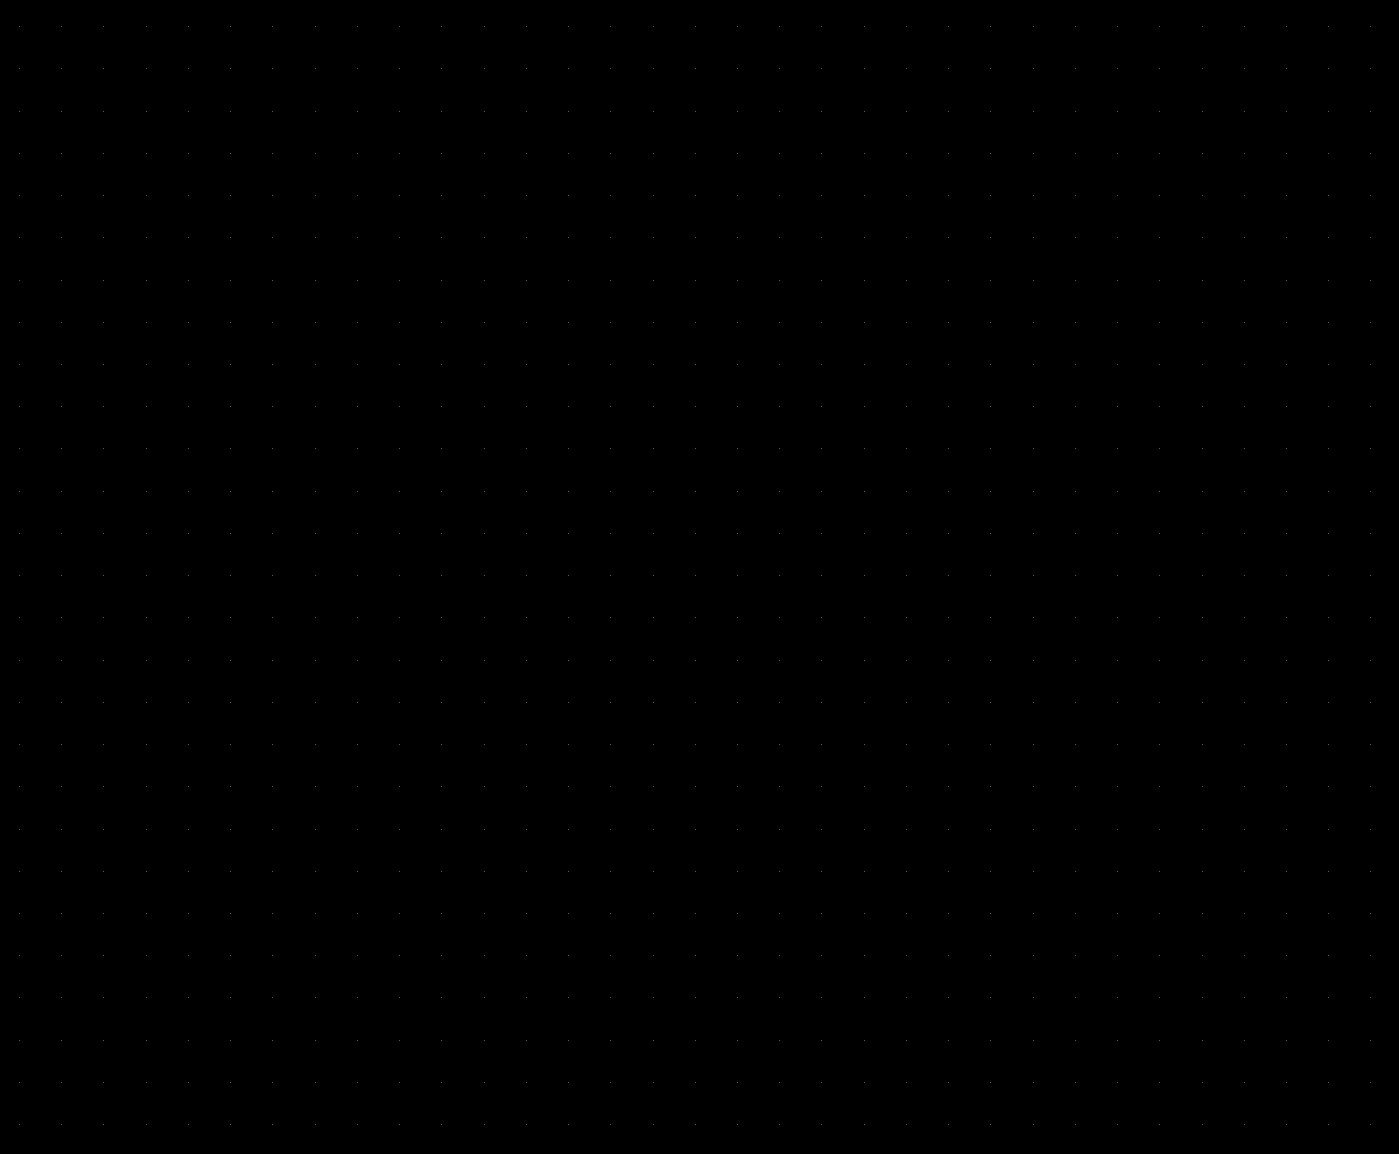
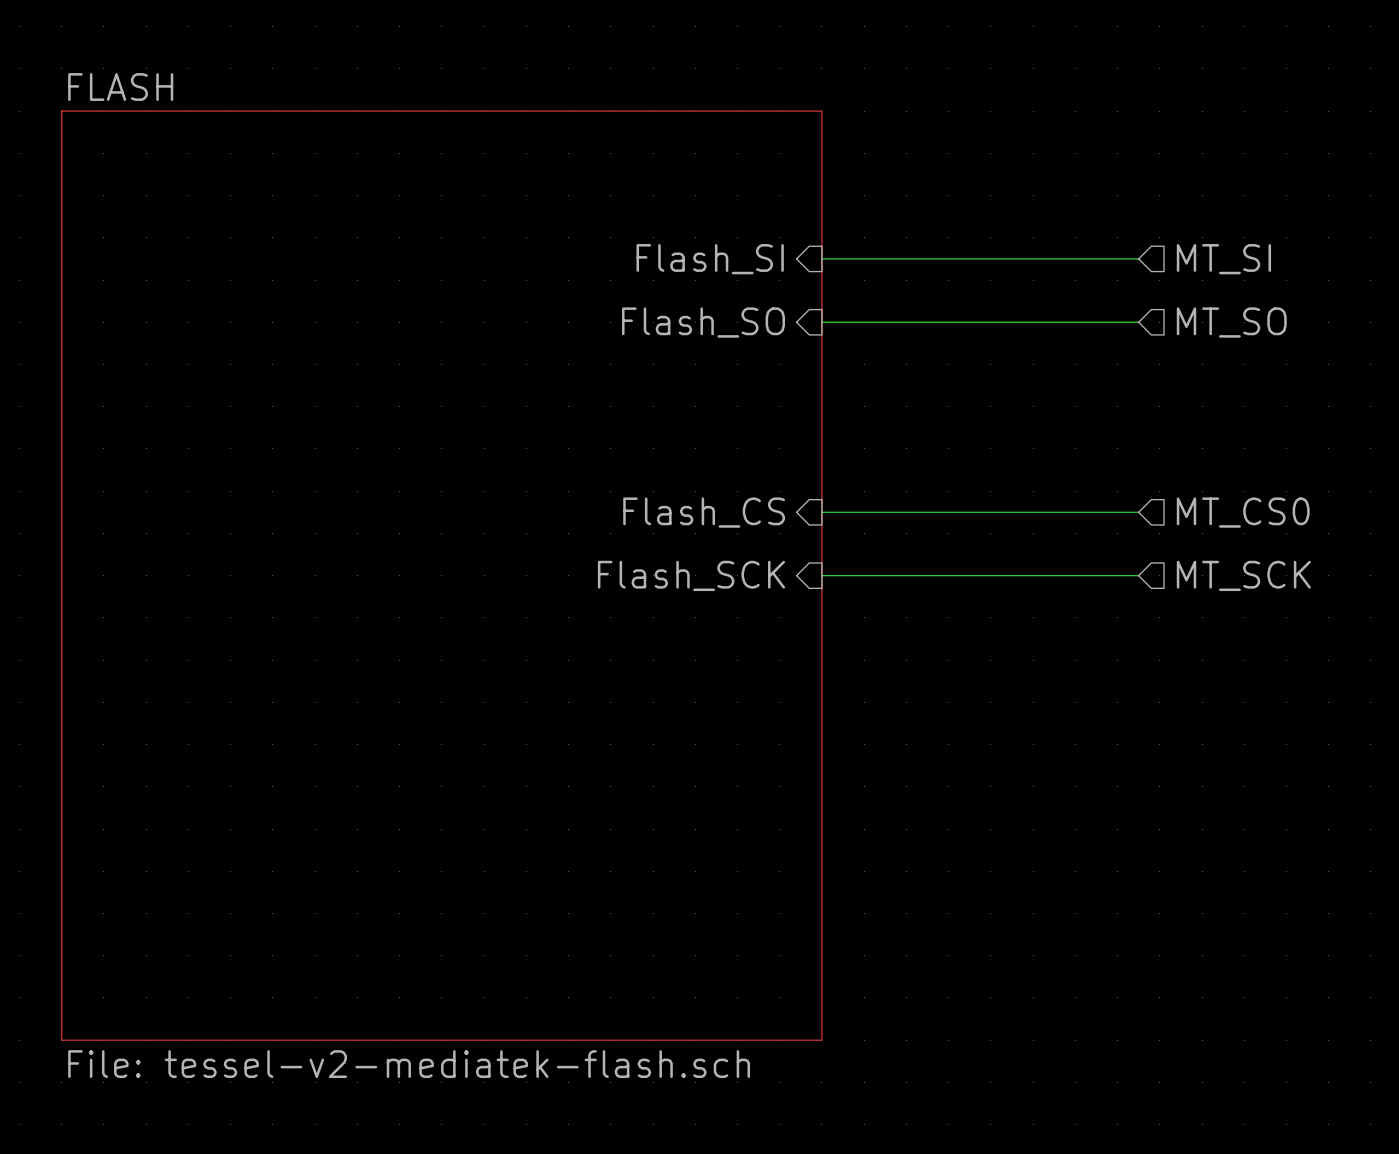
wire: none -> (821, 258) (1138, 258)
sheet pin: none -> Flash_SI (710, 259)
hierarchical label: none -> MT_SI (1223, 259)
sheet pin: none -> Flash_SO (703, 322)
wire: none -> (821, 322) (1138, 322)
hierarchical label: none -> MT_SO (1231, 322)
sheet pin: none -> Flash_CS (704, 512)
wire: none -> (821, 512) (1138, 512)
hierarchical label: none -> MT_CS0 (1243, 512)
sheet FLASH: none -> File: tessel-v2-mediatek-flash.sch (441, 575)
sheet pin: none -> Flash_SCK (691, 575)
wire: none -> (821, 575) (1138, 575)
hierarchical label: none -> MT_SCK (1243, 575)

